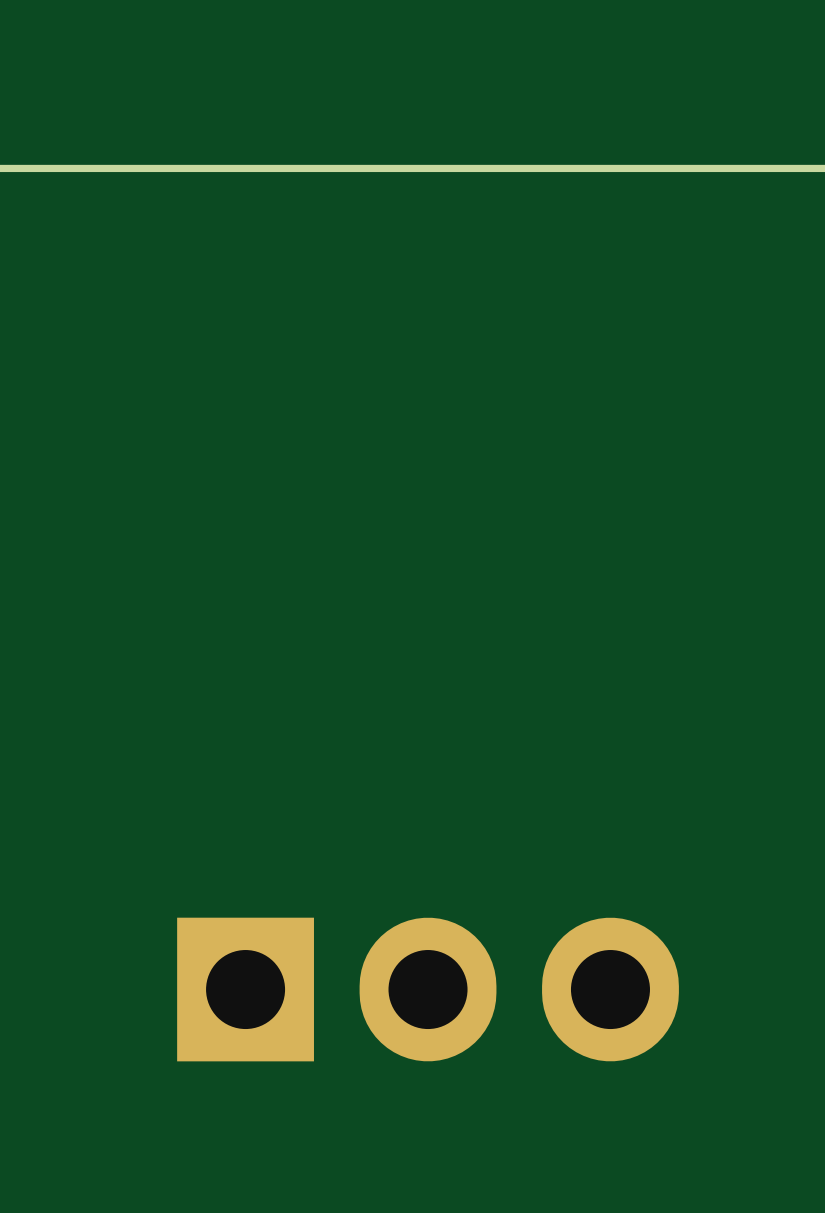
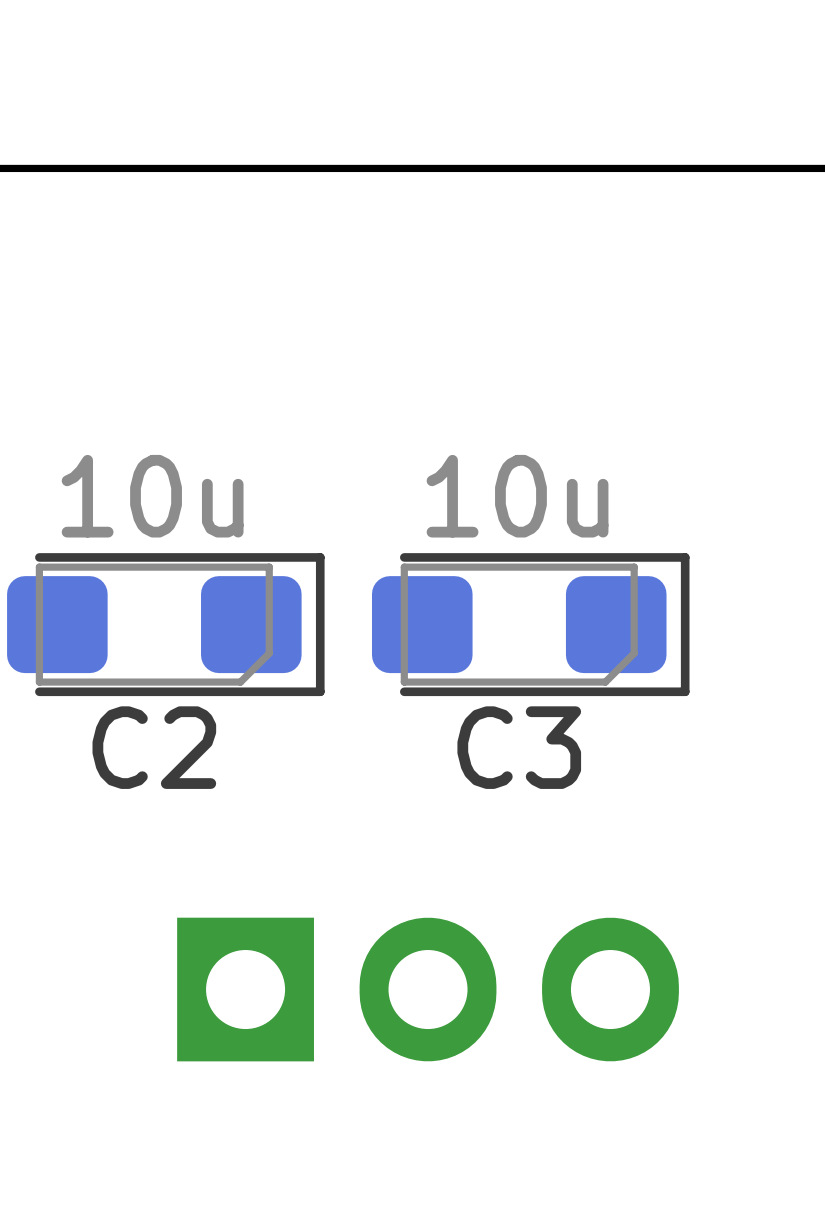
C2: none -> 10u (165, 624)
C3: none -> 10u (530, 624)

